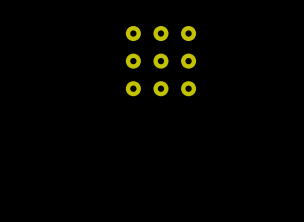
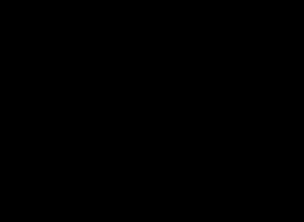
part: (160, 61) -> none

